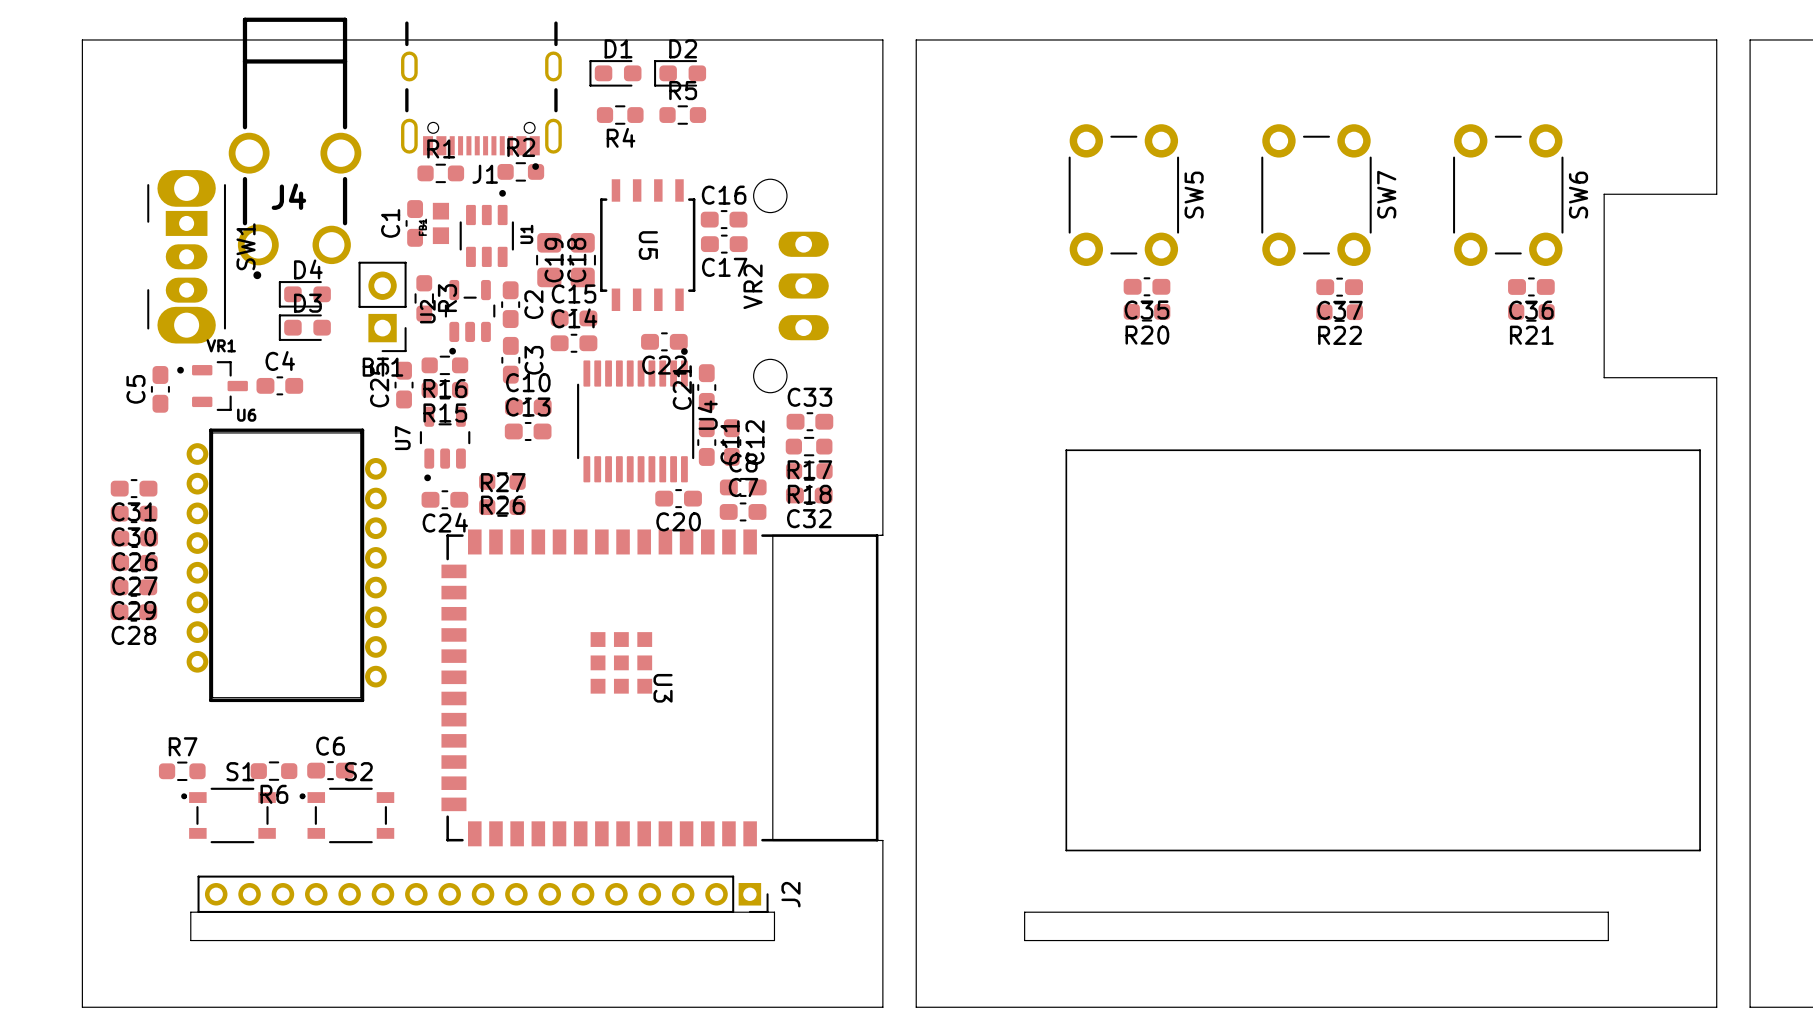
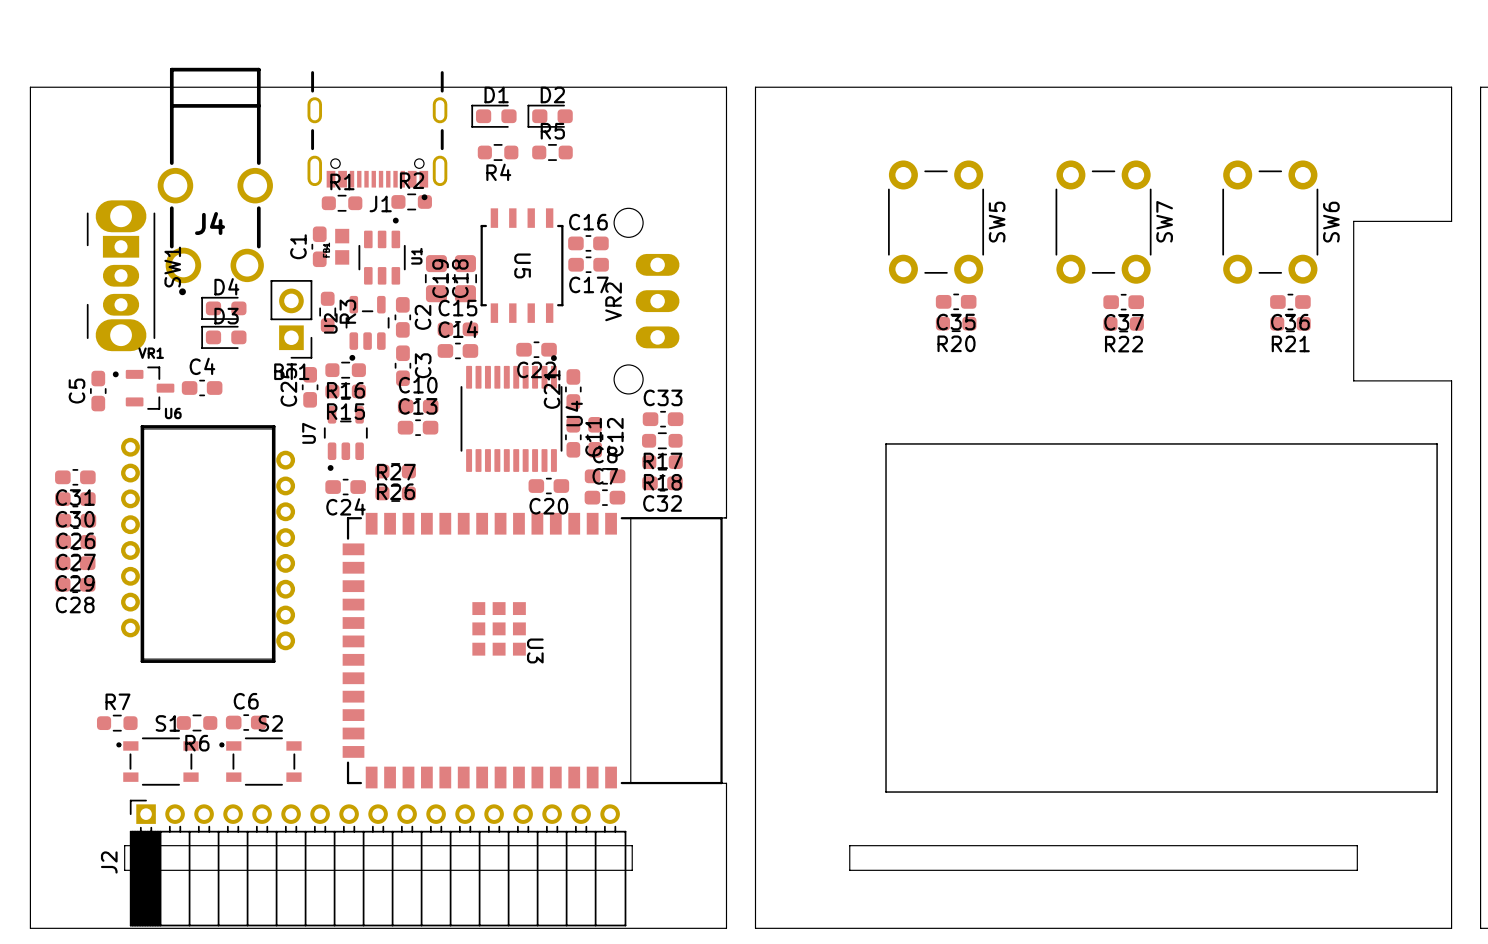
J2 footprint: [197, 875, 769, 913] -> [129, 799, 627, 927]
J2 name position: J2 (790, 894) -> J2 (109, 862)

